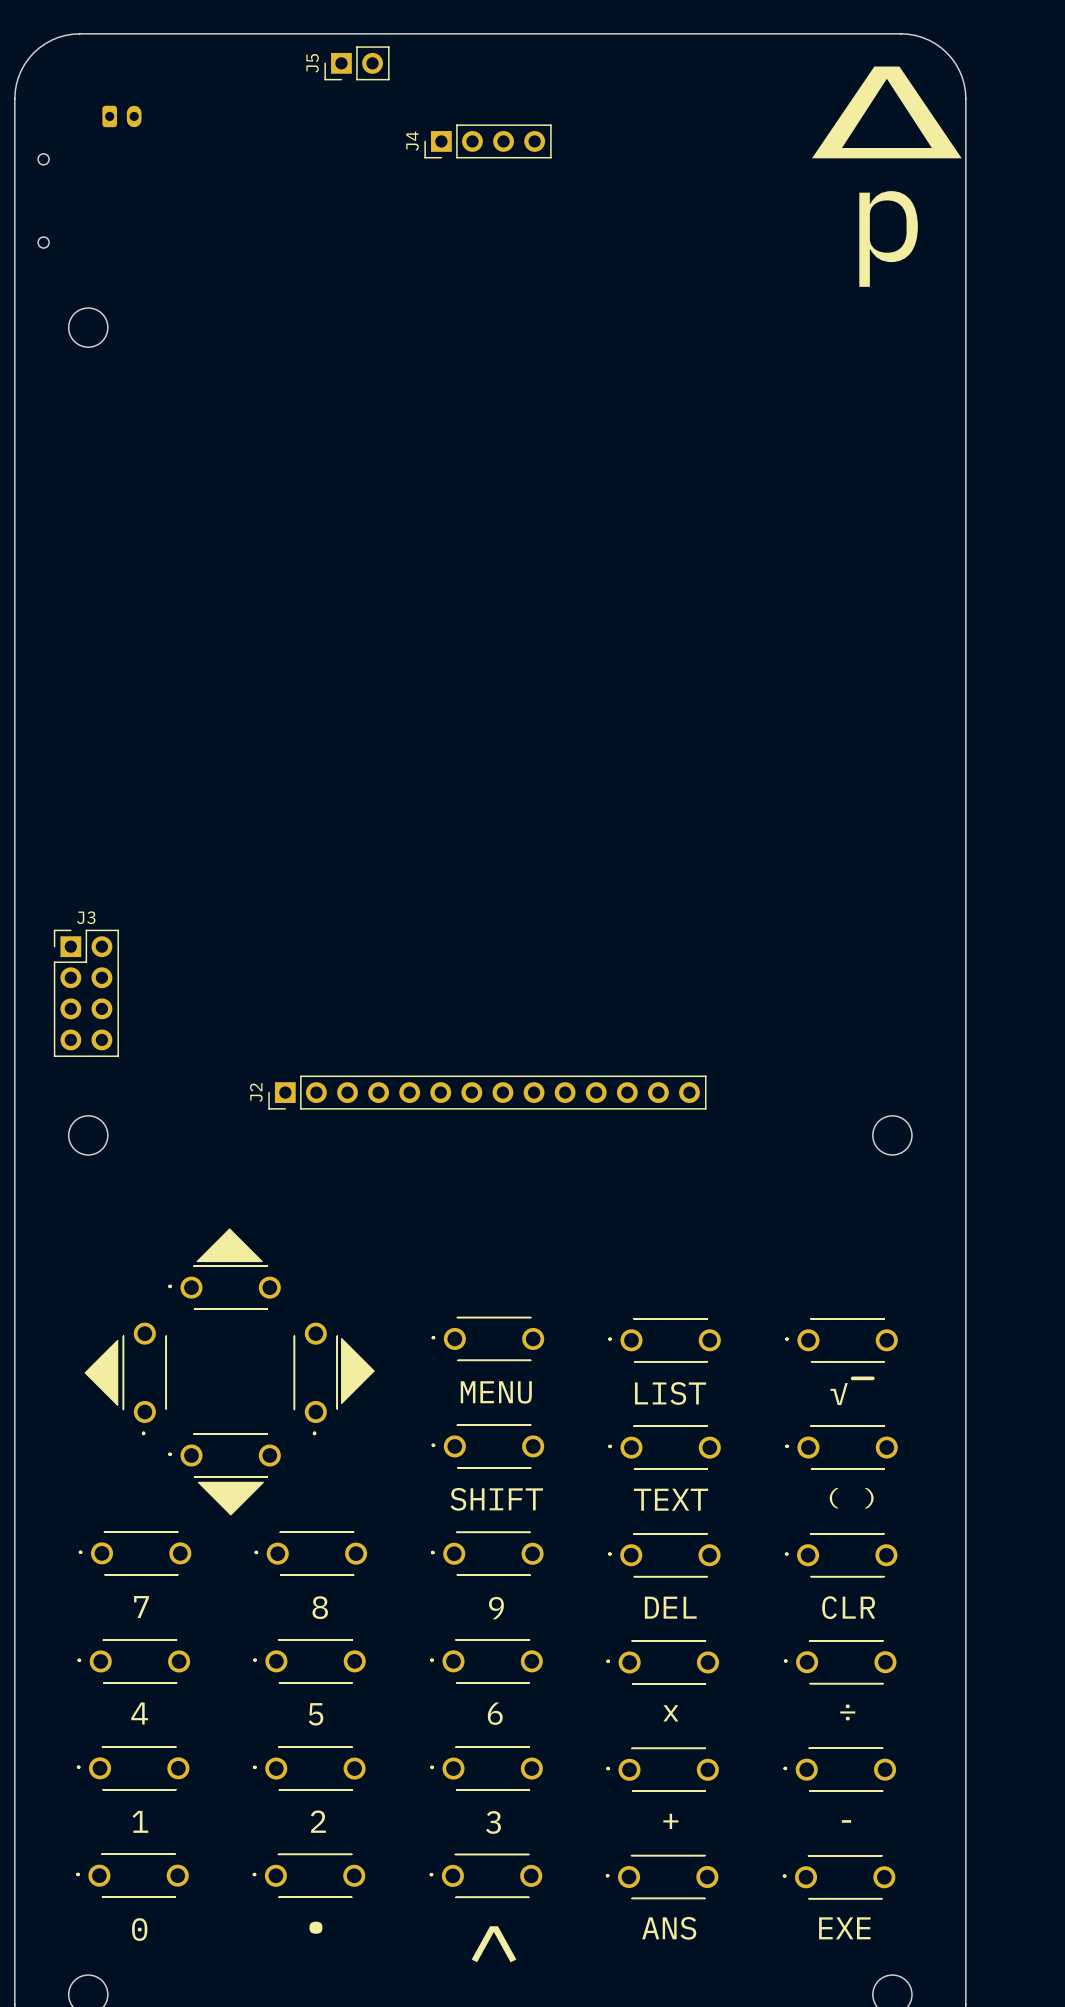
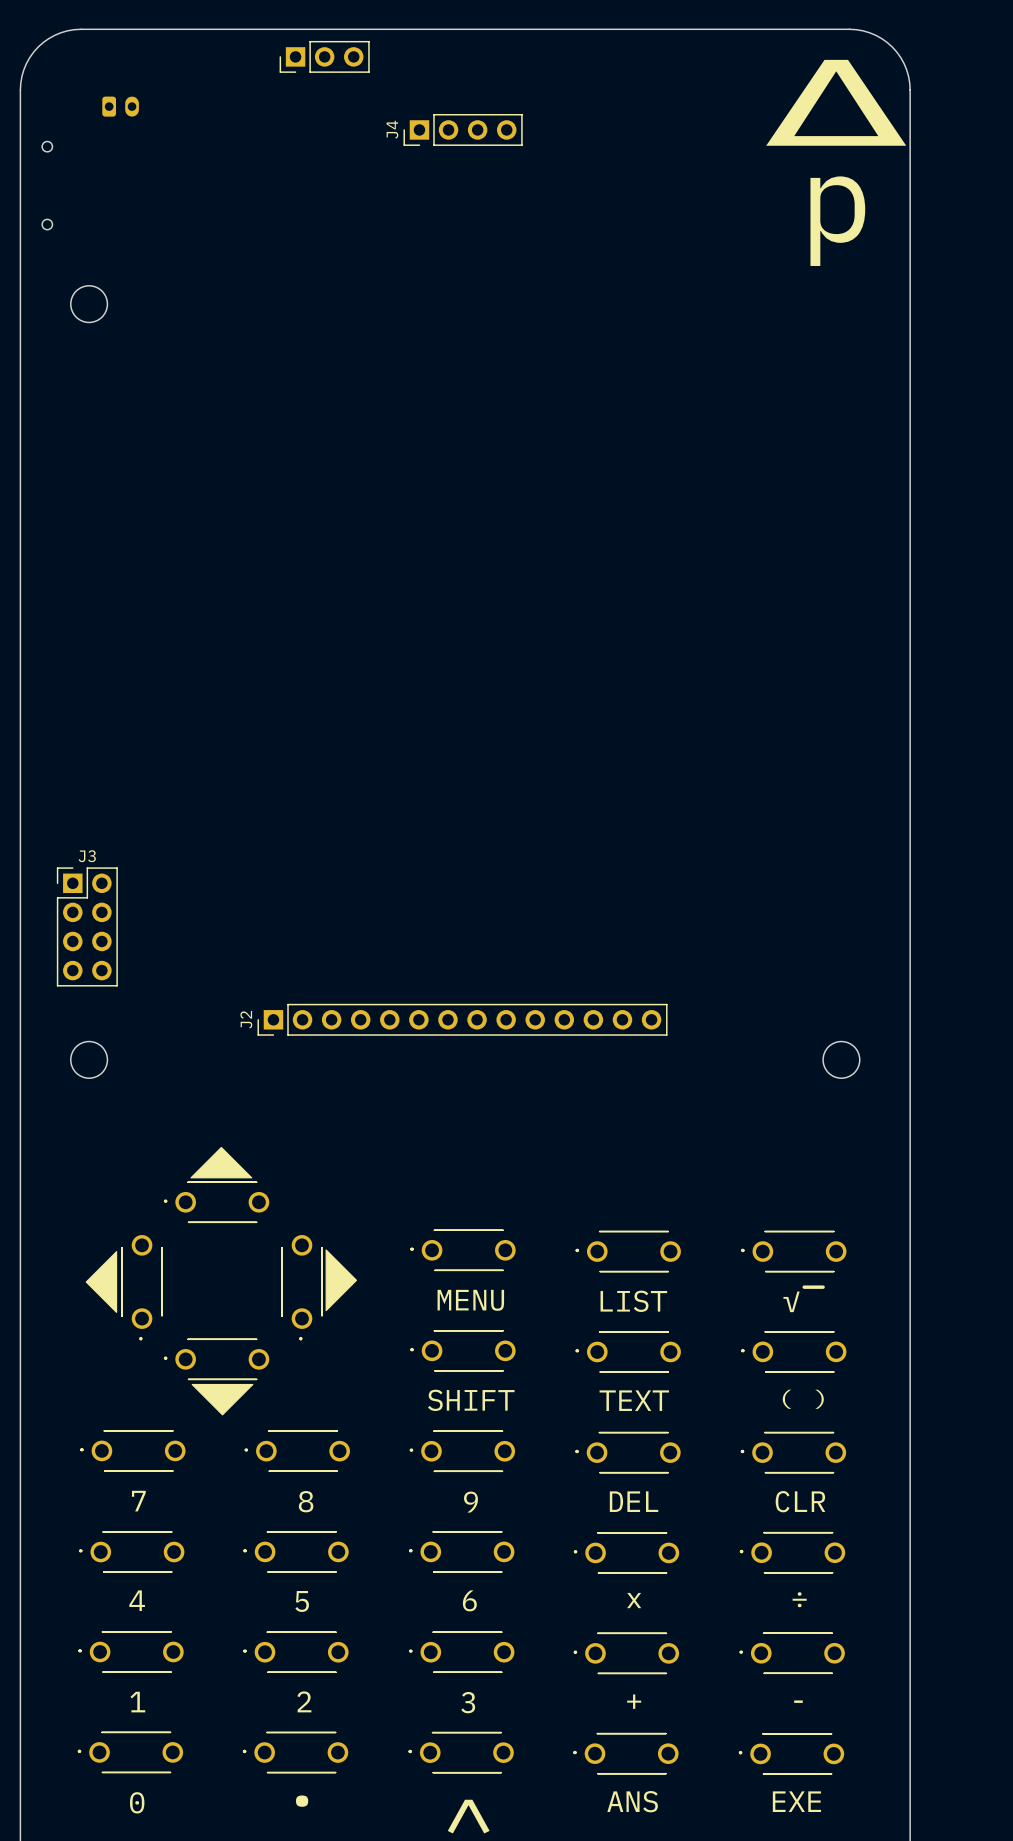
part: none -> (324, 56)
J5: (356, 63) -> none

